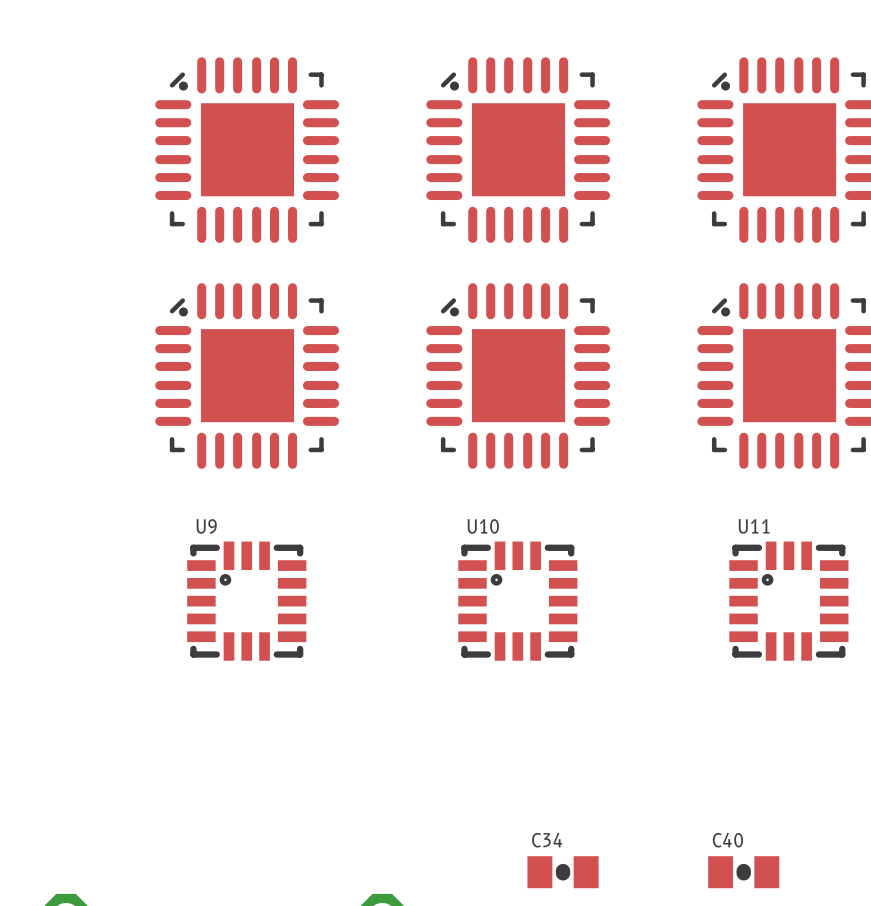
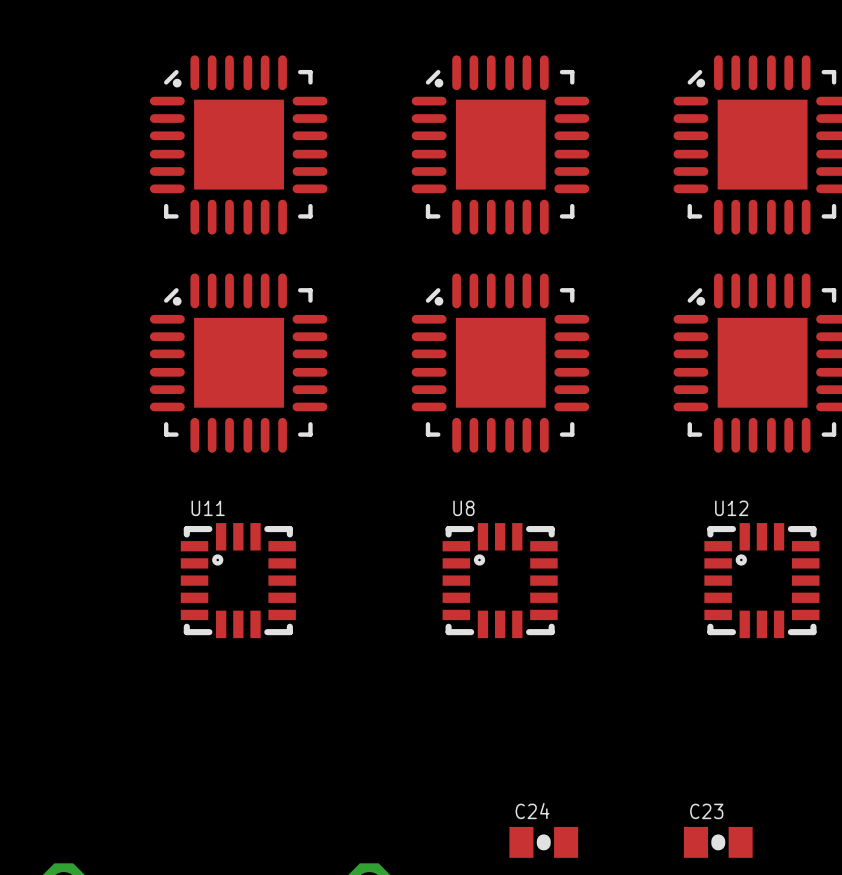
U9 name: U9 (206, 526) -> U11 (208, 508)
U10 name: U10 (483, 526) -> U8 (463, 508)
U11 name: U11 (754, 526) -> U12 (731, 508)
C34 name: C34 (547, 840) -> C24 (532, 811)
C40 name: C40 (727, 840) -> C23 (706, 811)

